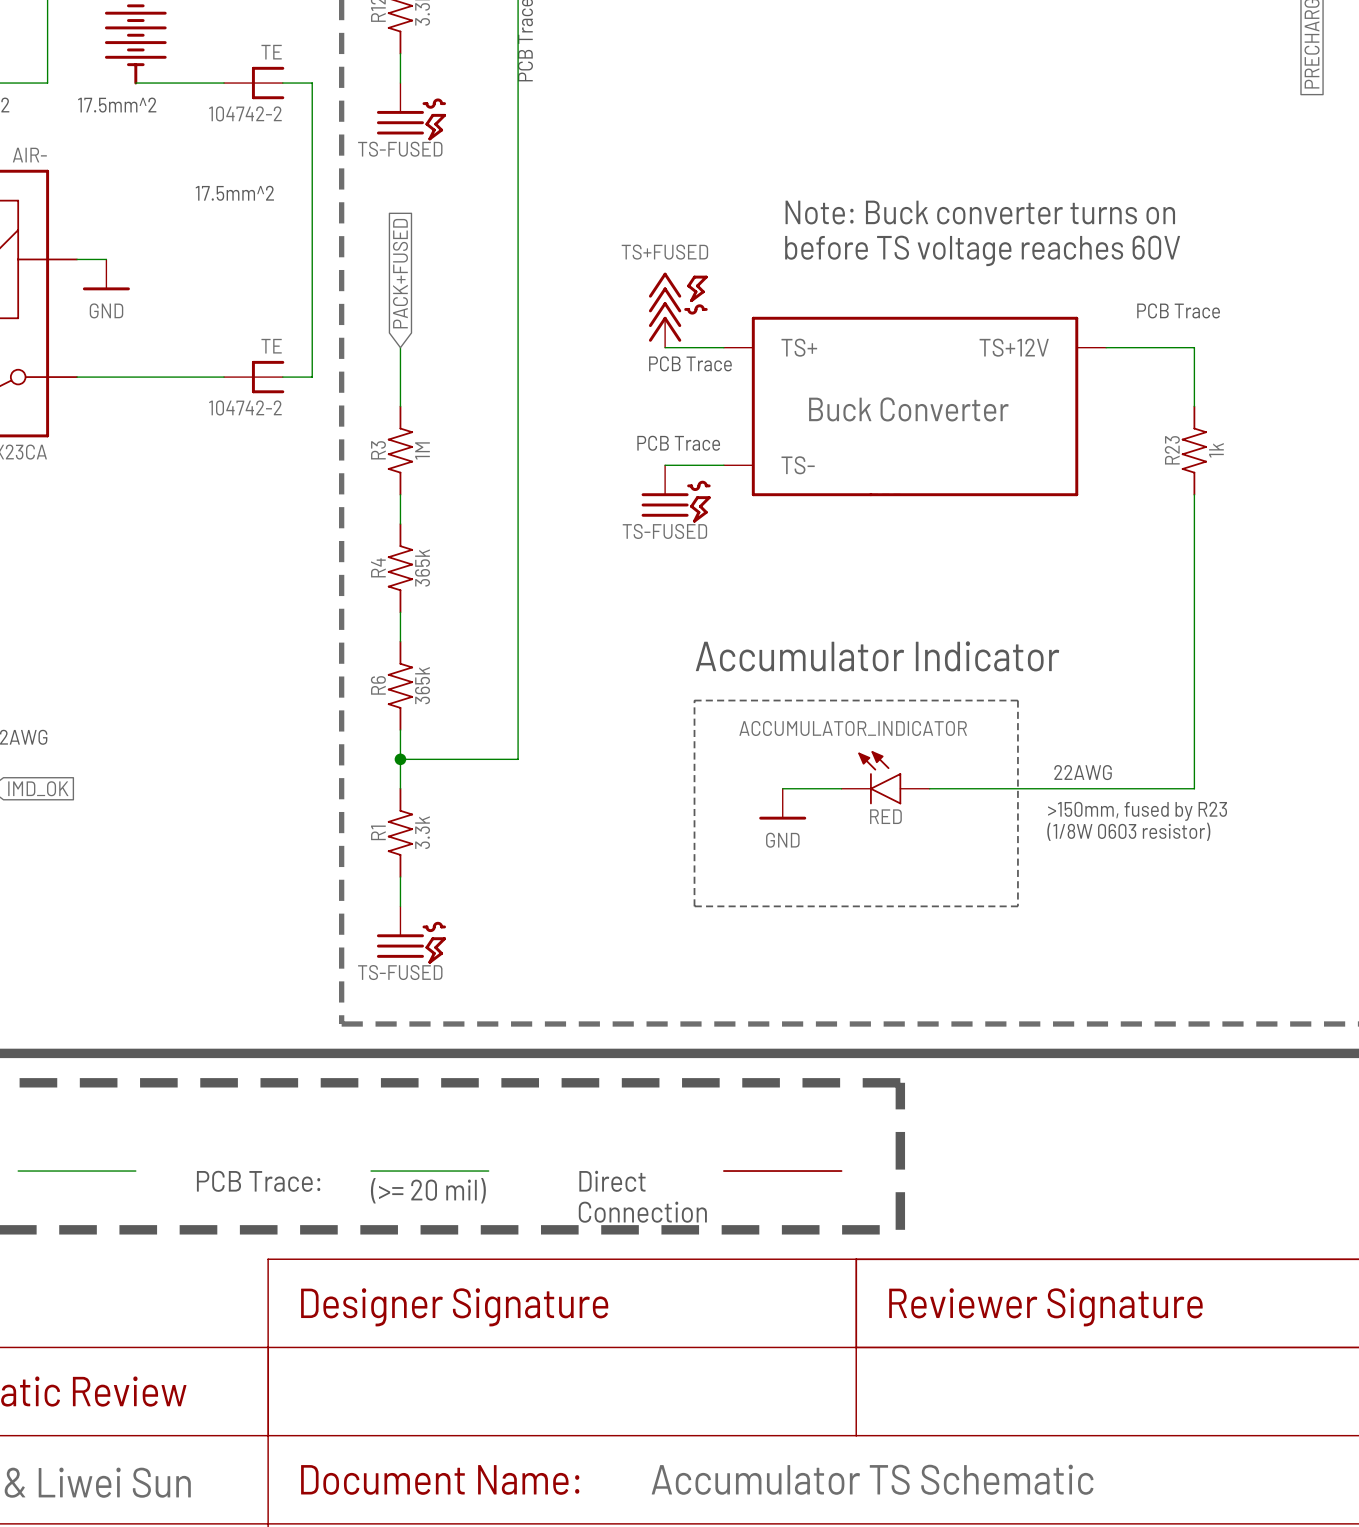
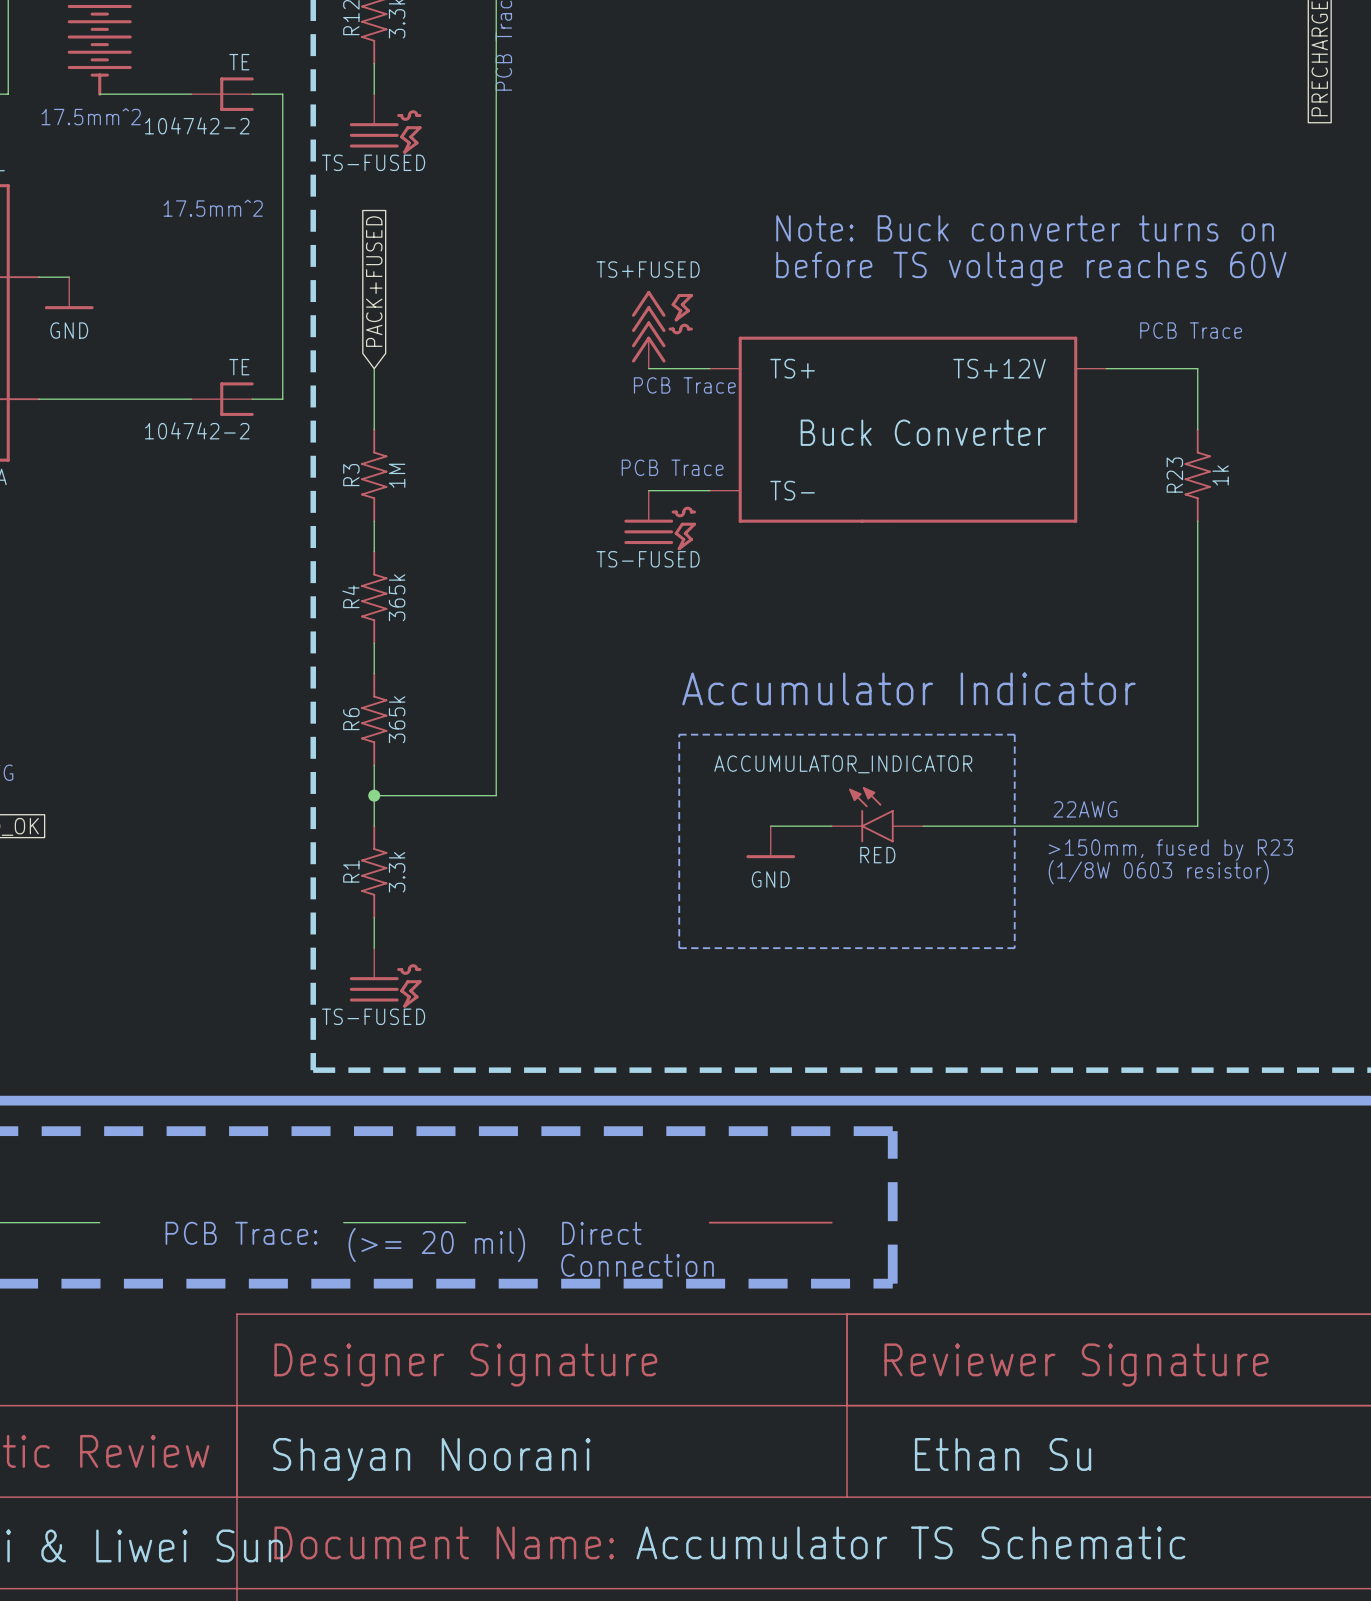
text: none -> Ethan Su (1003, 1454)
text: none -> Shayan Noorani (431, 1459)

